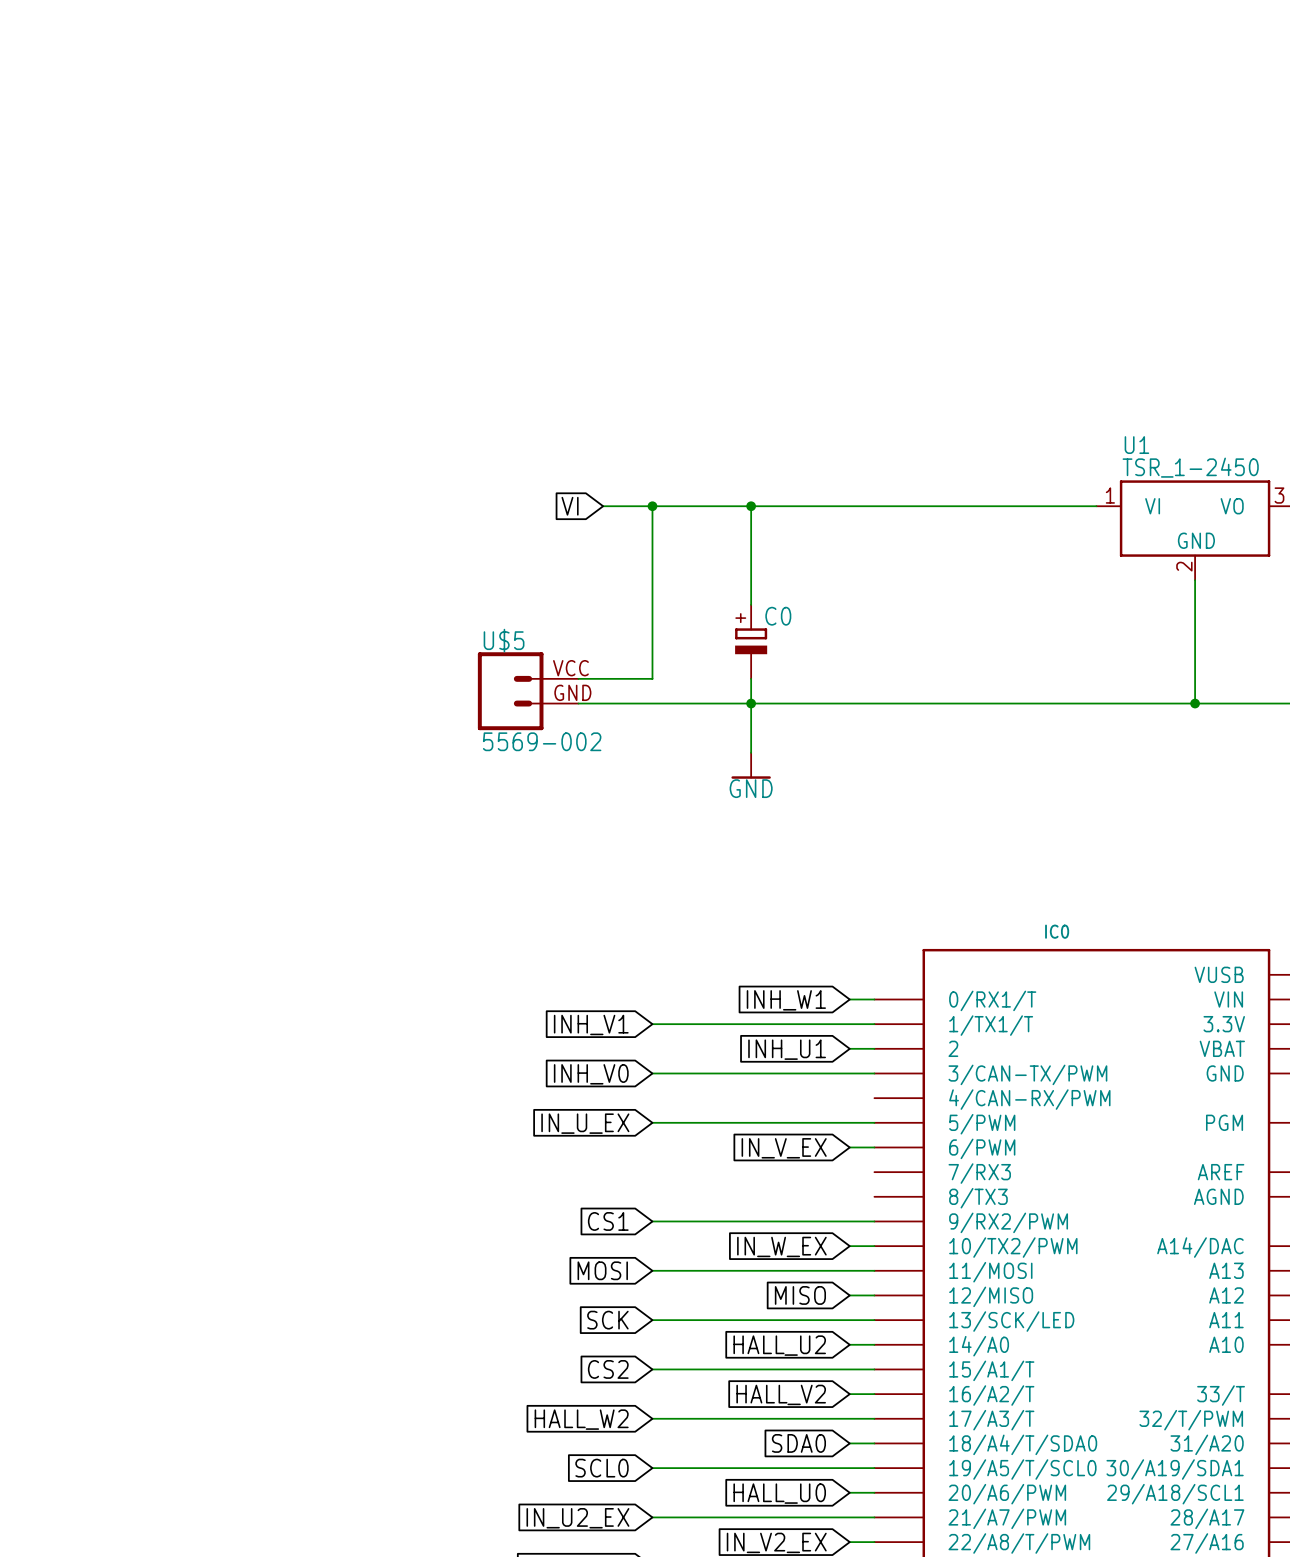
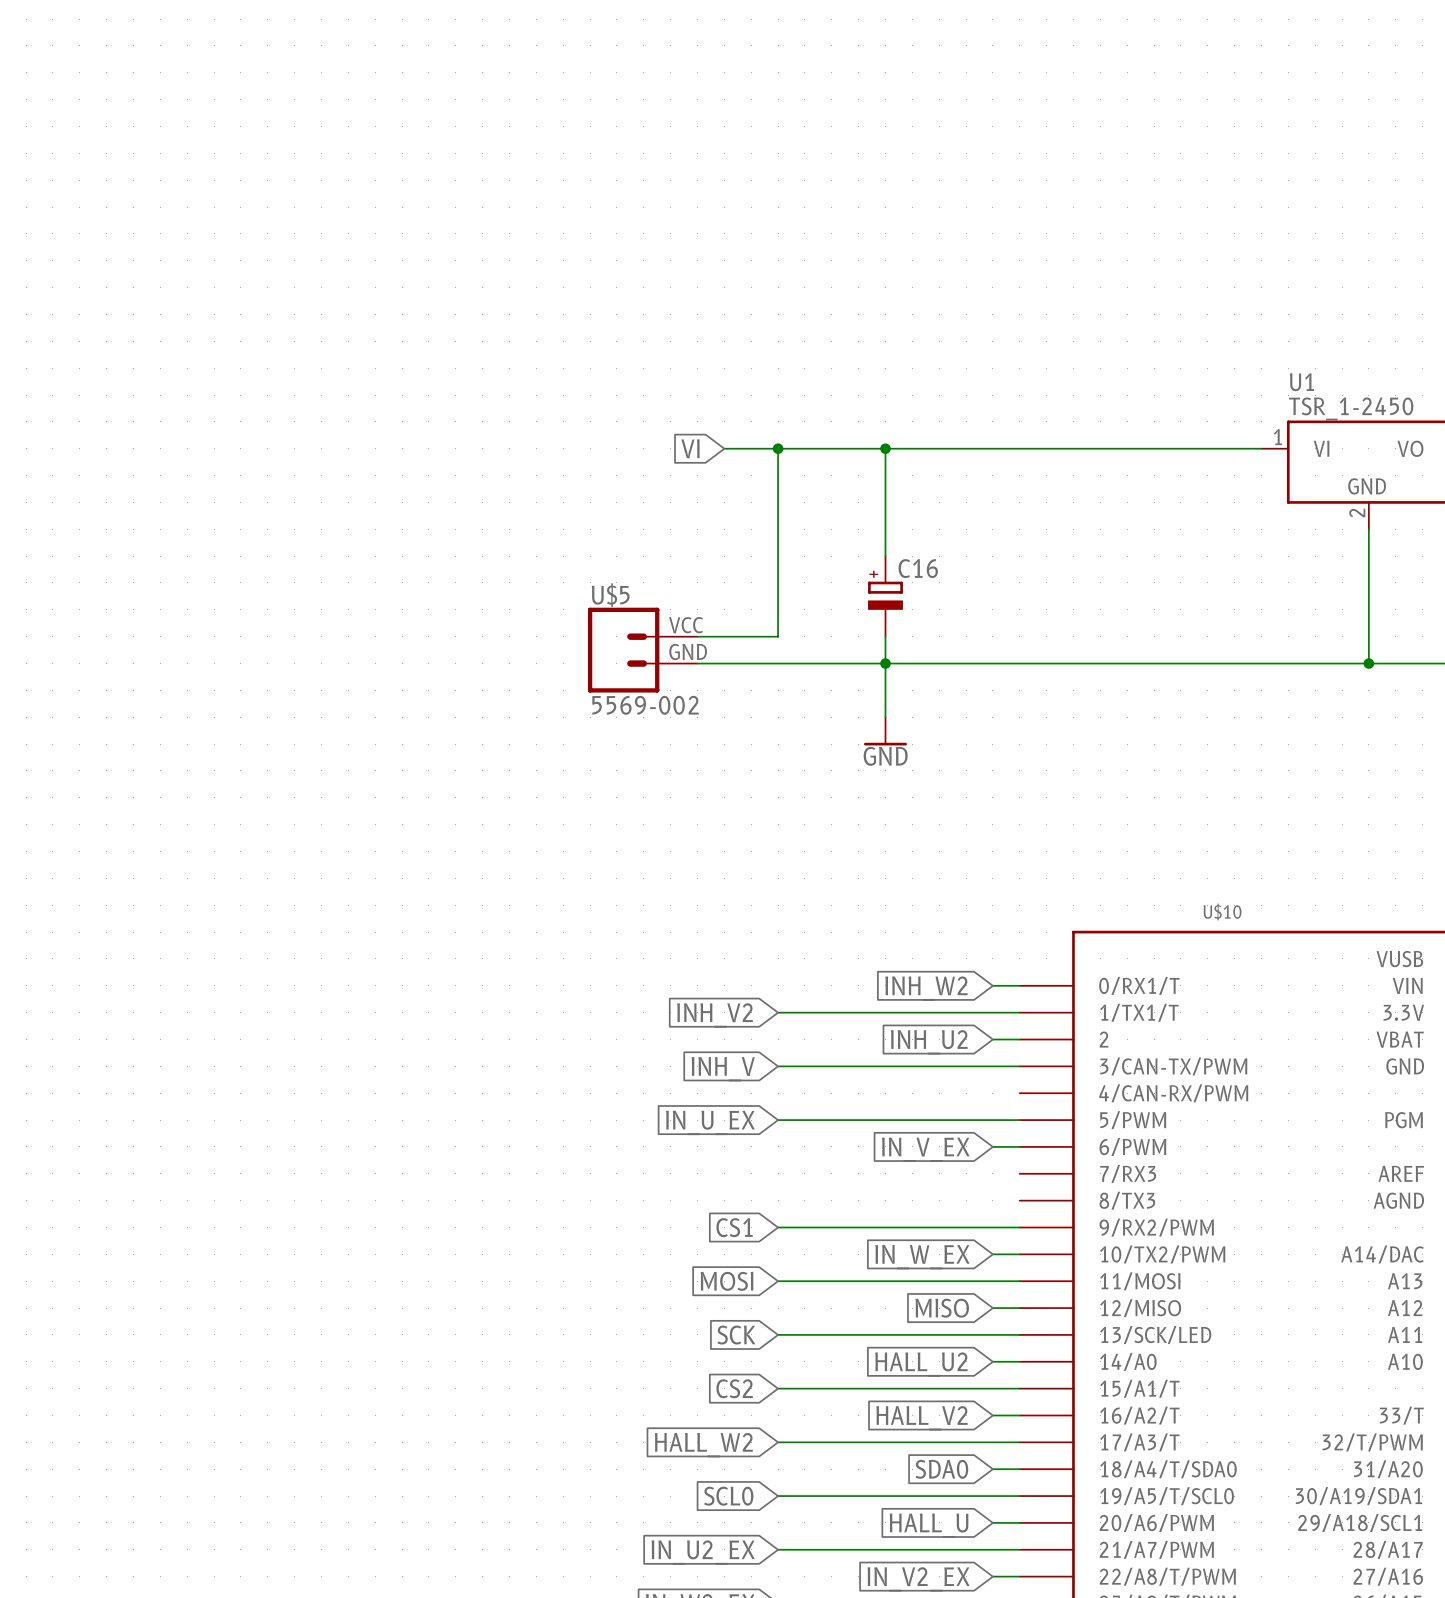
C0 name: C0 (778, 616) -> C16 (918, 568)
IC0 name: IC0 (1057, 931) -> U$10 (1222, 911)
global label: INH_W1 (786, 1000) -> INH_W2 (926, 988)
global label: INH_V1 (591, 1024) -> INH_V2 (714, 1015)
global label: INH_U1 (787, 1049) -> INH_U2 (929, 1042)
global label: INH_V0 (591, 1074) -> INH_V (723, 1069)
global label: HALL_U0 (779, 1493) -> HALL_U (929, 1525)

